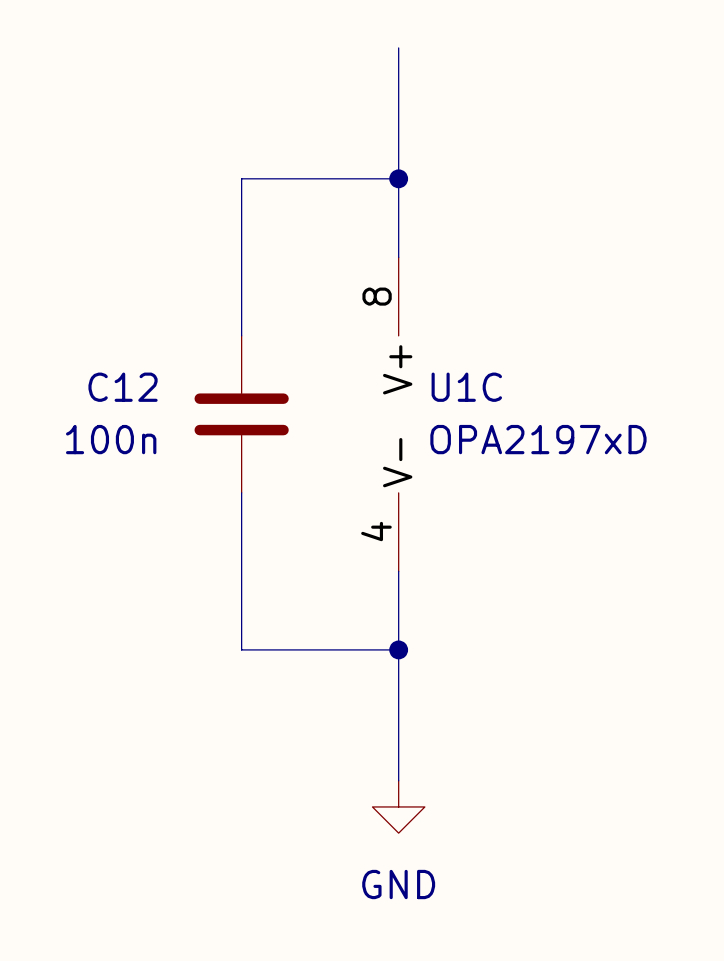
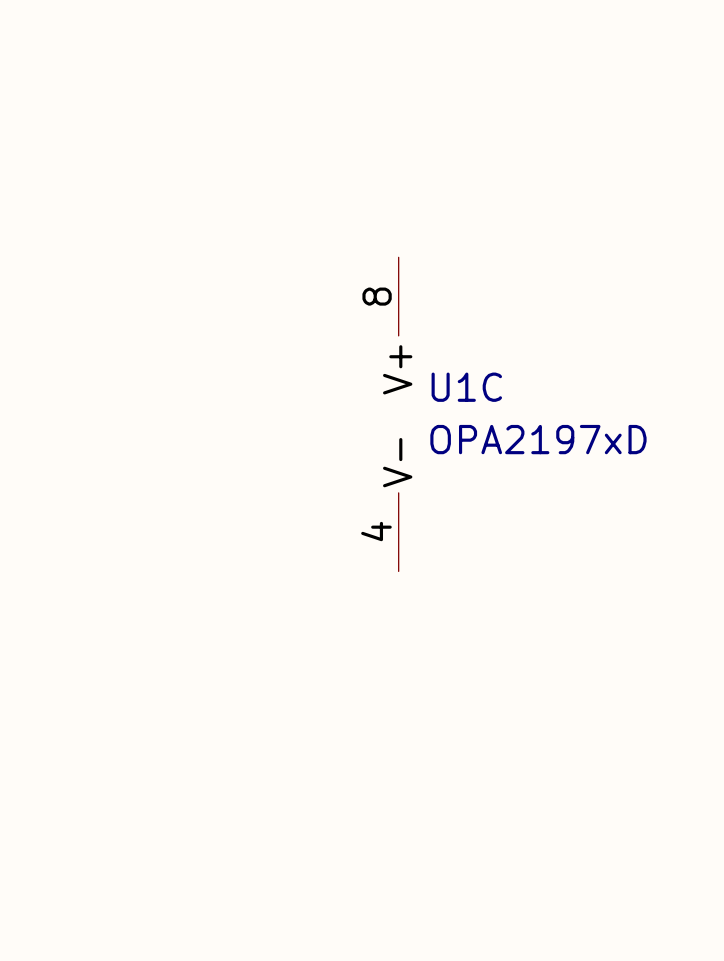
wire: (398, 47) (398, 257) -> none
wire: (398, 178) (241, 178) (241, 335) -> none
junction: (398, 178) -> none
C12: 100n (241, 414) -> none
wire: (241, 492) (241, 649) (398, 649) -> none
wire: (398, 571) (398, 780) -> none
junction: (398, 649) -> none
power symbol: GND (398, 806) -> none

